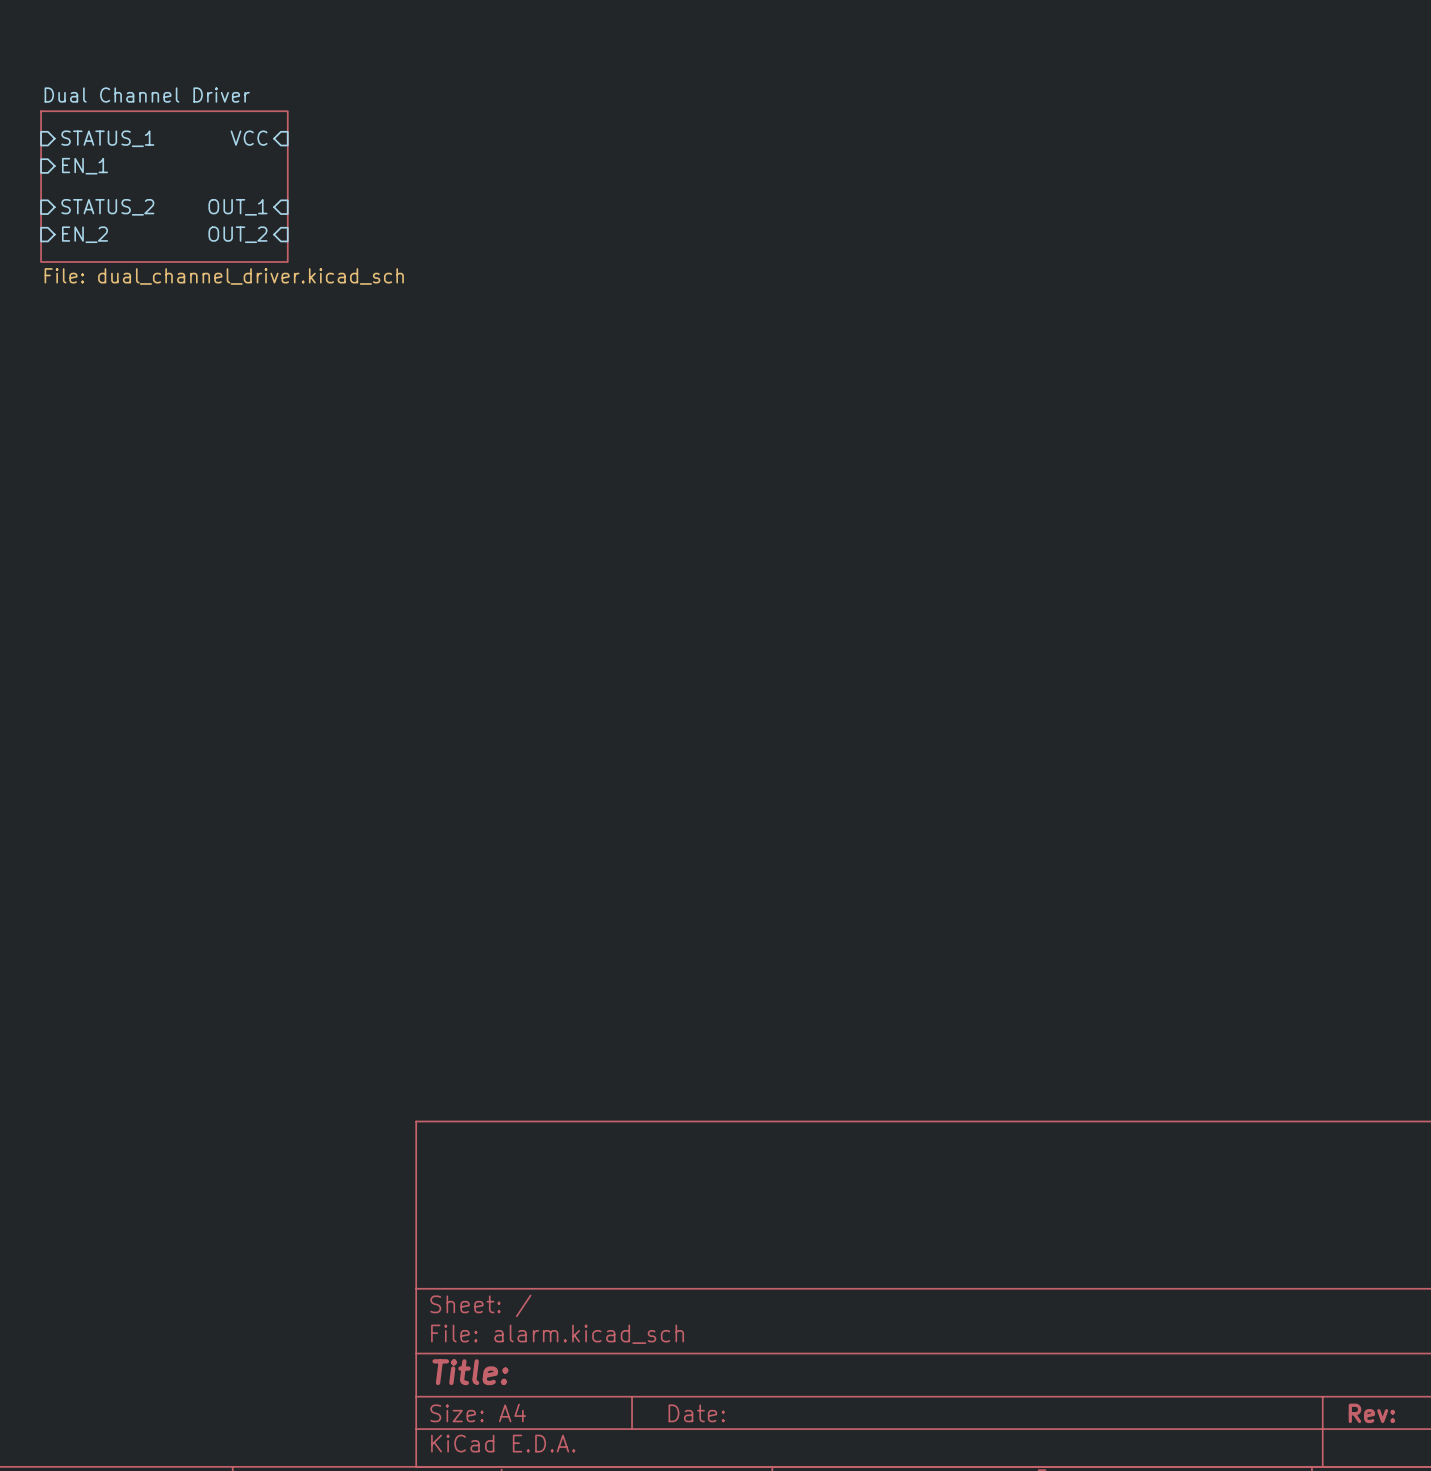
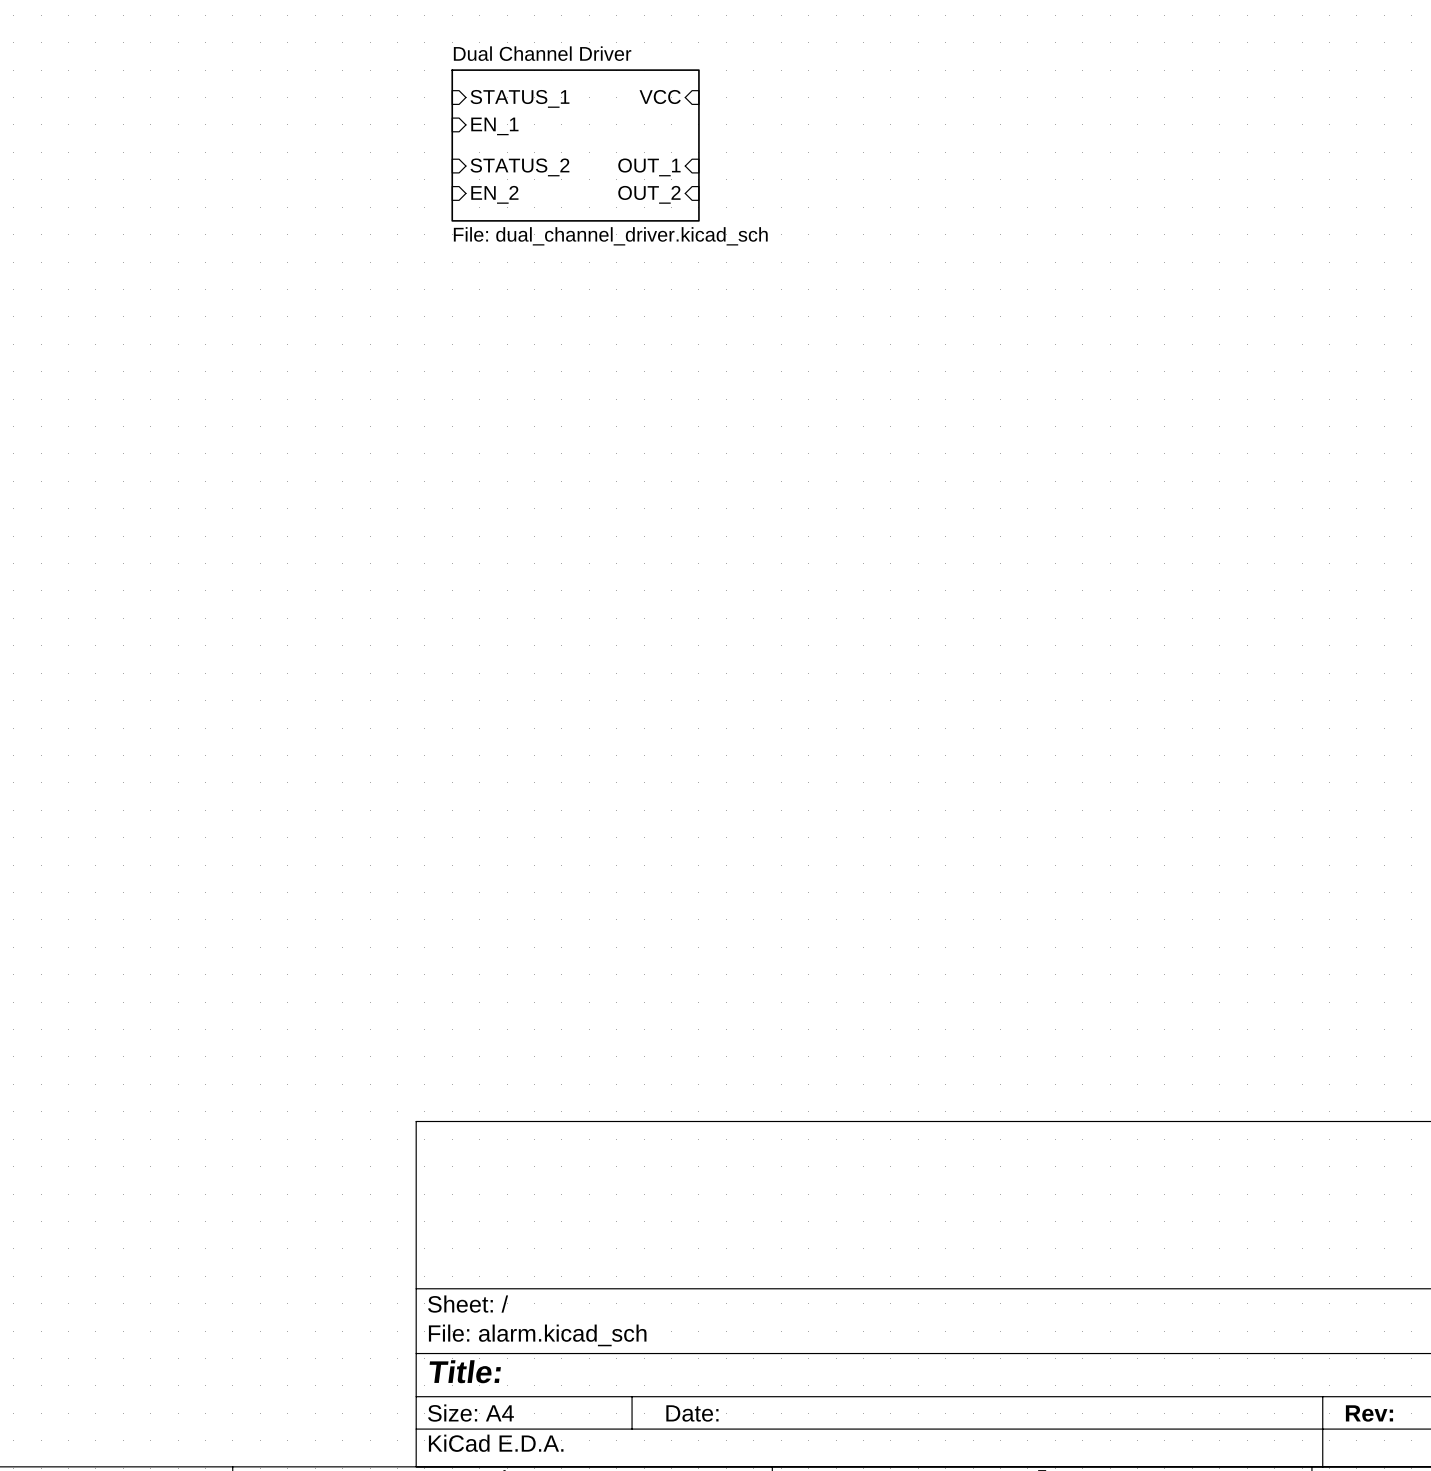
sheet pin: none -> STATUS_1 (519, 98)
sheet pin: none -> VCC (660, 97)
sheet pin: none -> EN_1 (494, 126)
sheet pin: STATUS_1 (107, 138) -> none
sheet pin: VCC (249, 138) -> none
sheet Dual Channel Driver: none -> File: dual_channel_driver.kicad_sch (575, 145)
sheet pin: EN_1 (84, 166) -> none
sheet pin: none -> STATUS_2 (519, 167)
sheet pin: none -> OUT_1 (649, 167)
sheet Dual Channel Driver: File: dual_channel_driver.kicad_sch (164, 186) -> none
sheet pin: none -> EN_2 (494, 194)
sheet pin: none -> OUT_2 (649, 194)
sheet pin: STATUS_2 (107, 207) -> none
sheet pin: OUT_1 (237, 207) -> none
sheet pin: EN_2 (84, 234) -> none
sheet pin: OUT_2 (237, 234) -> none

